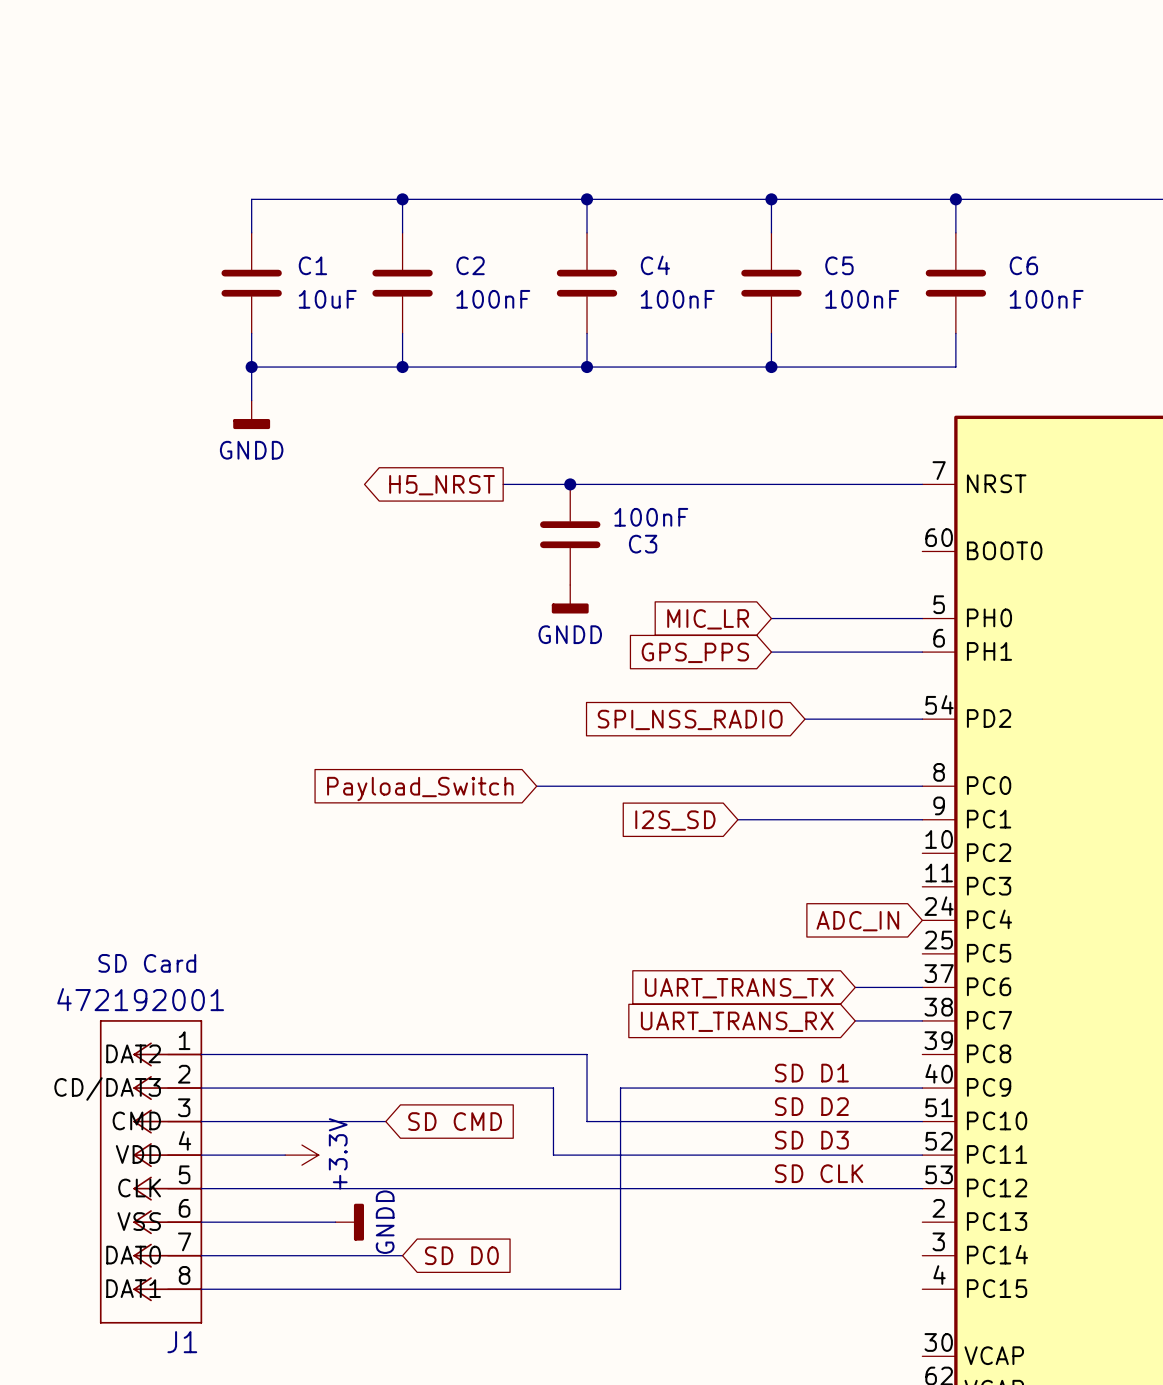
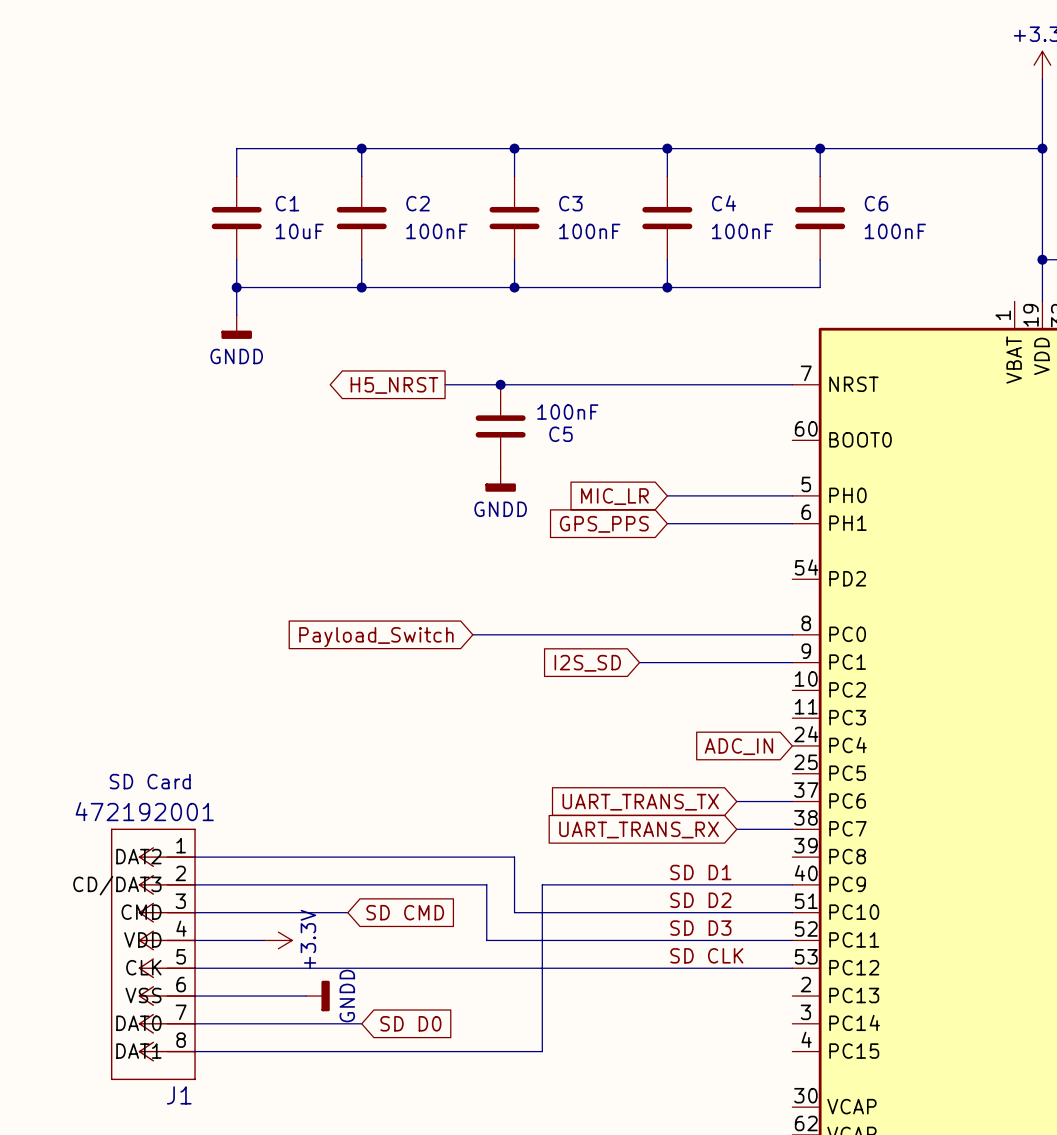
C4 name: C4 (655, 265) -> C3 (570, 203)
C5 name: C5 (839, 265) -> C4 (724, 203)
C3 name: C3 (643, 544) -> C5 (561, 434)
global label: SPI_NSS_RADIO (690, 719) -> none
wire: (804, 719) (922, 719) -> none

